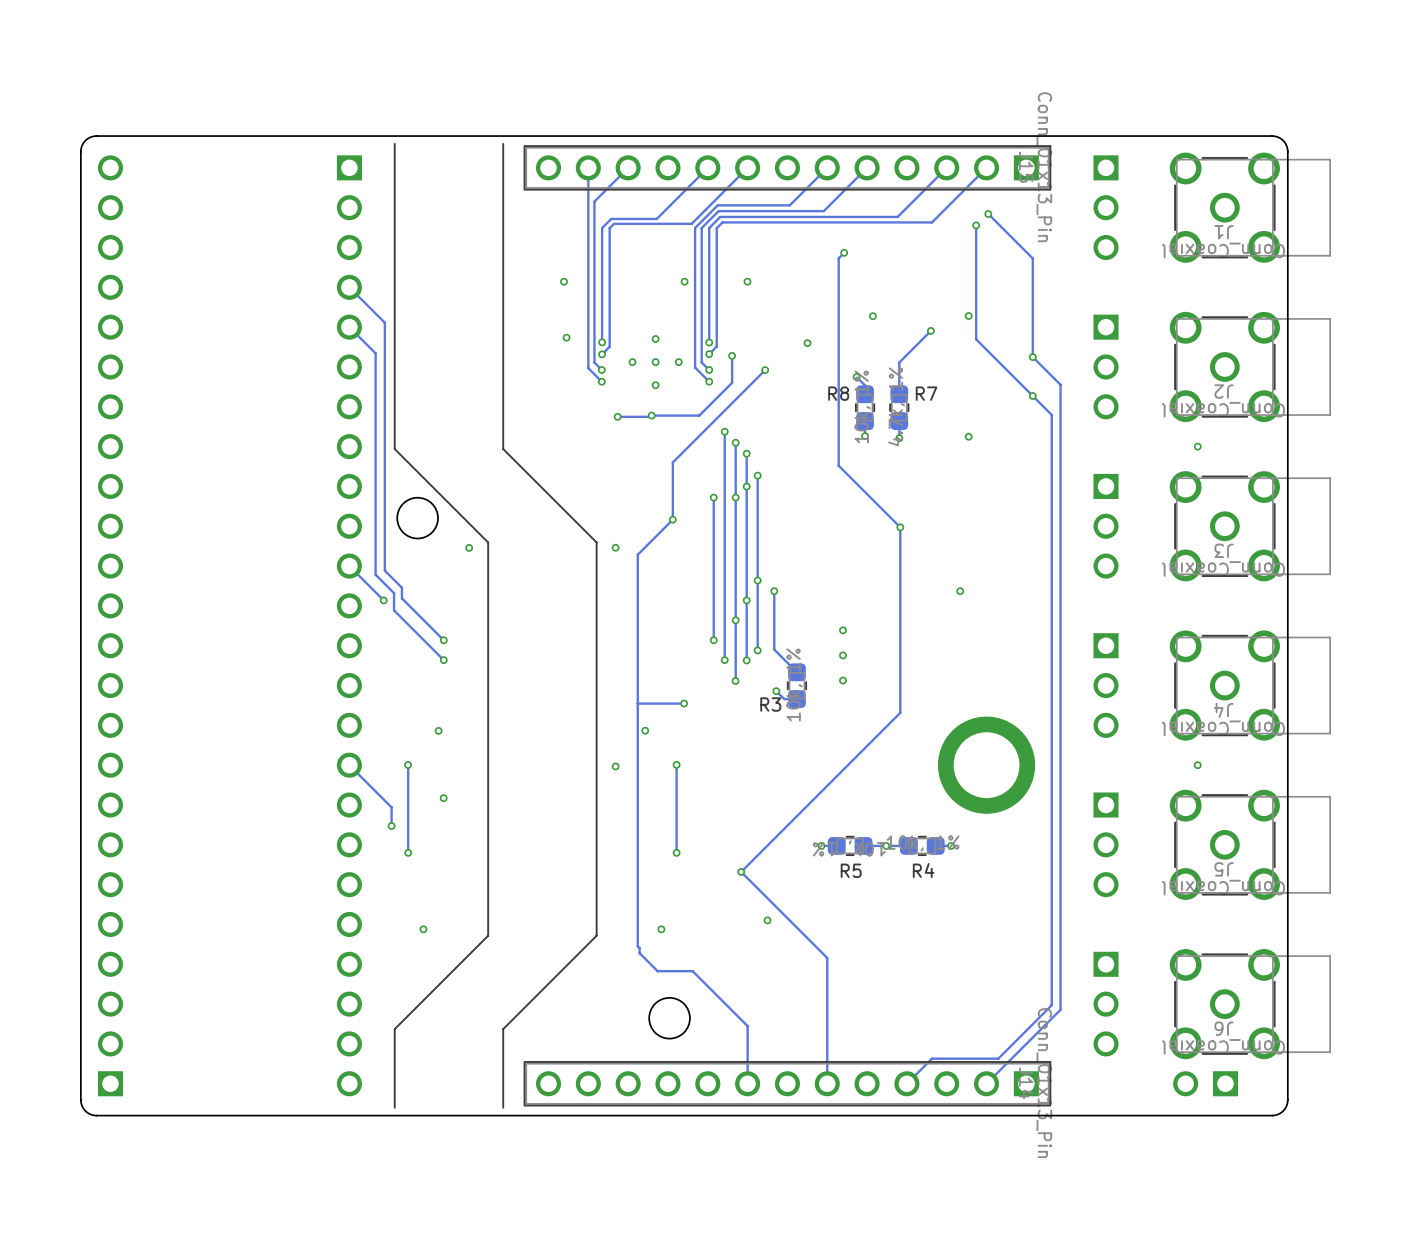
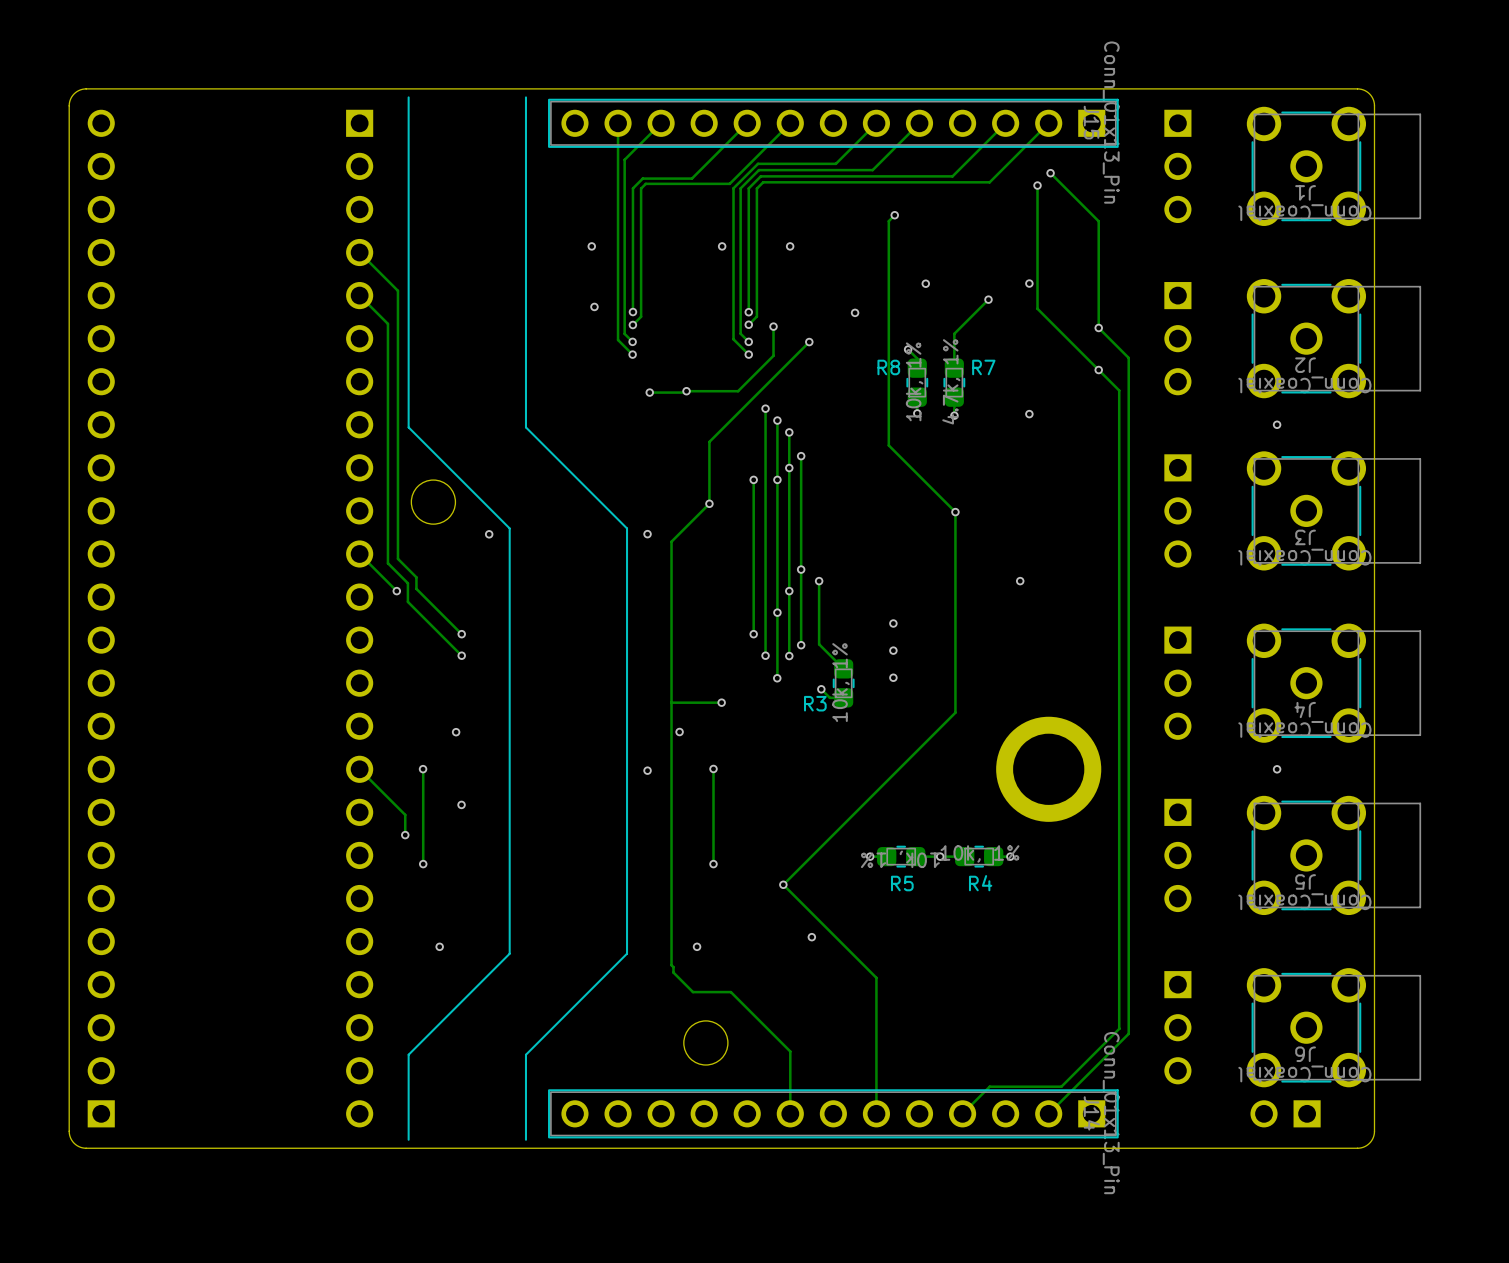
part: (655, 362) -> none

